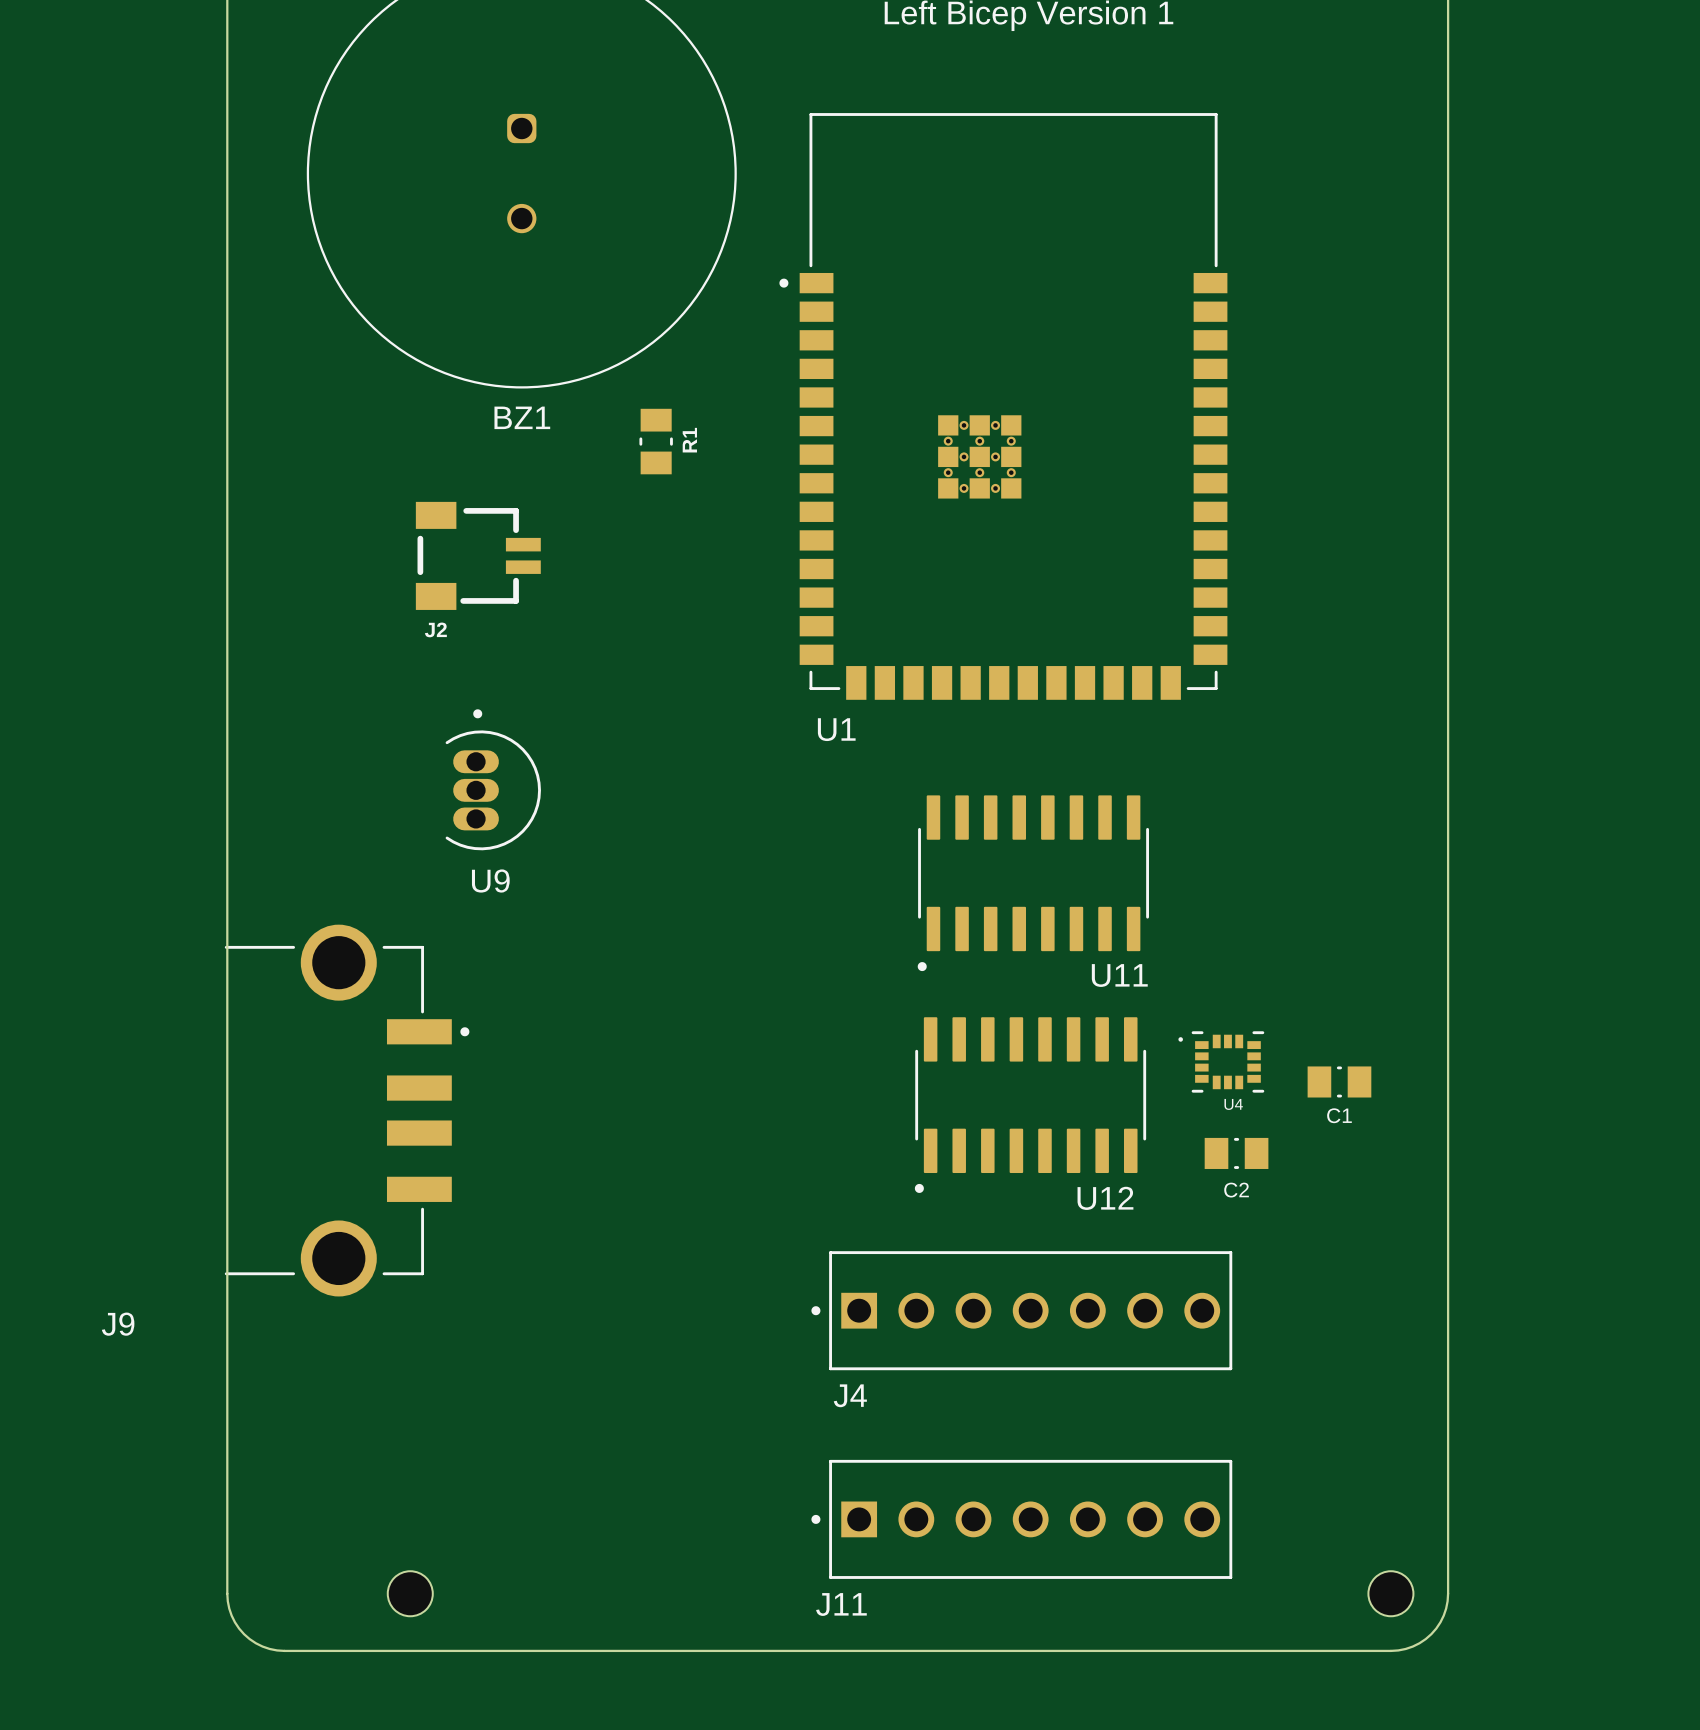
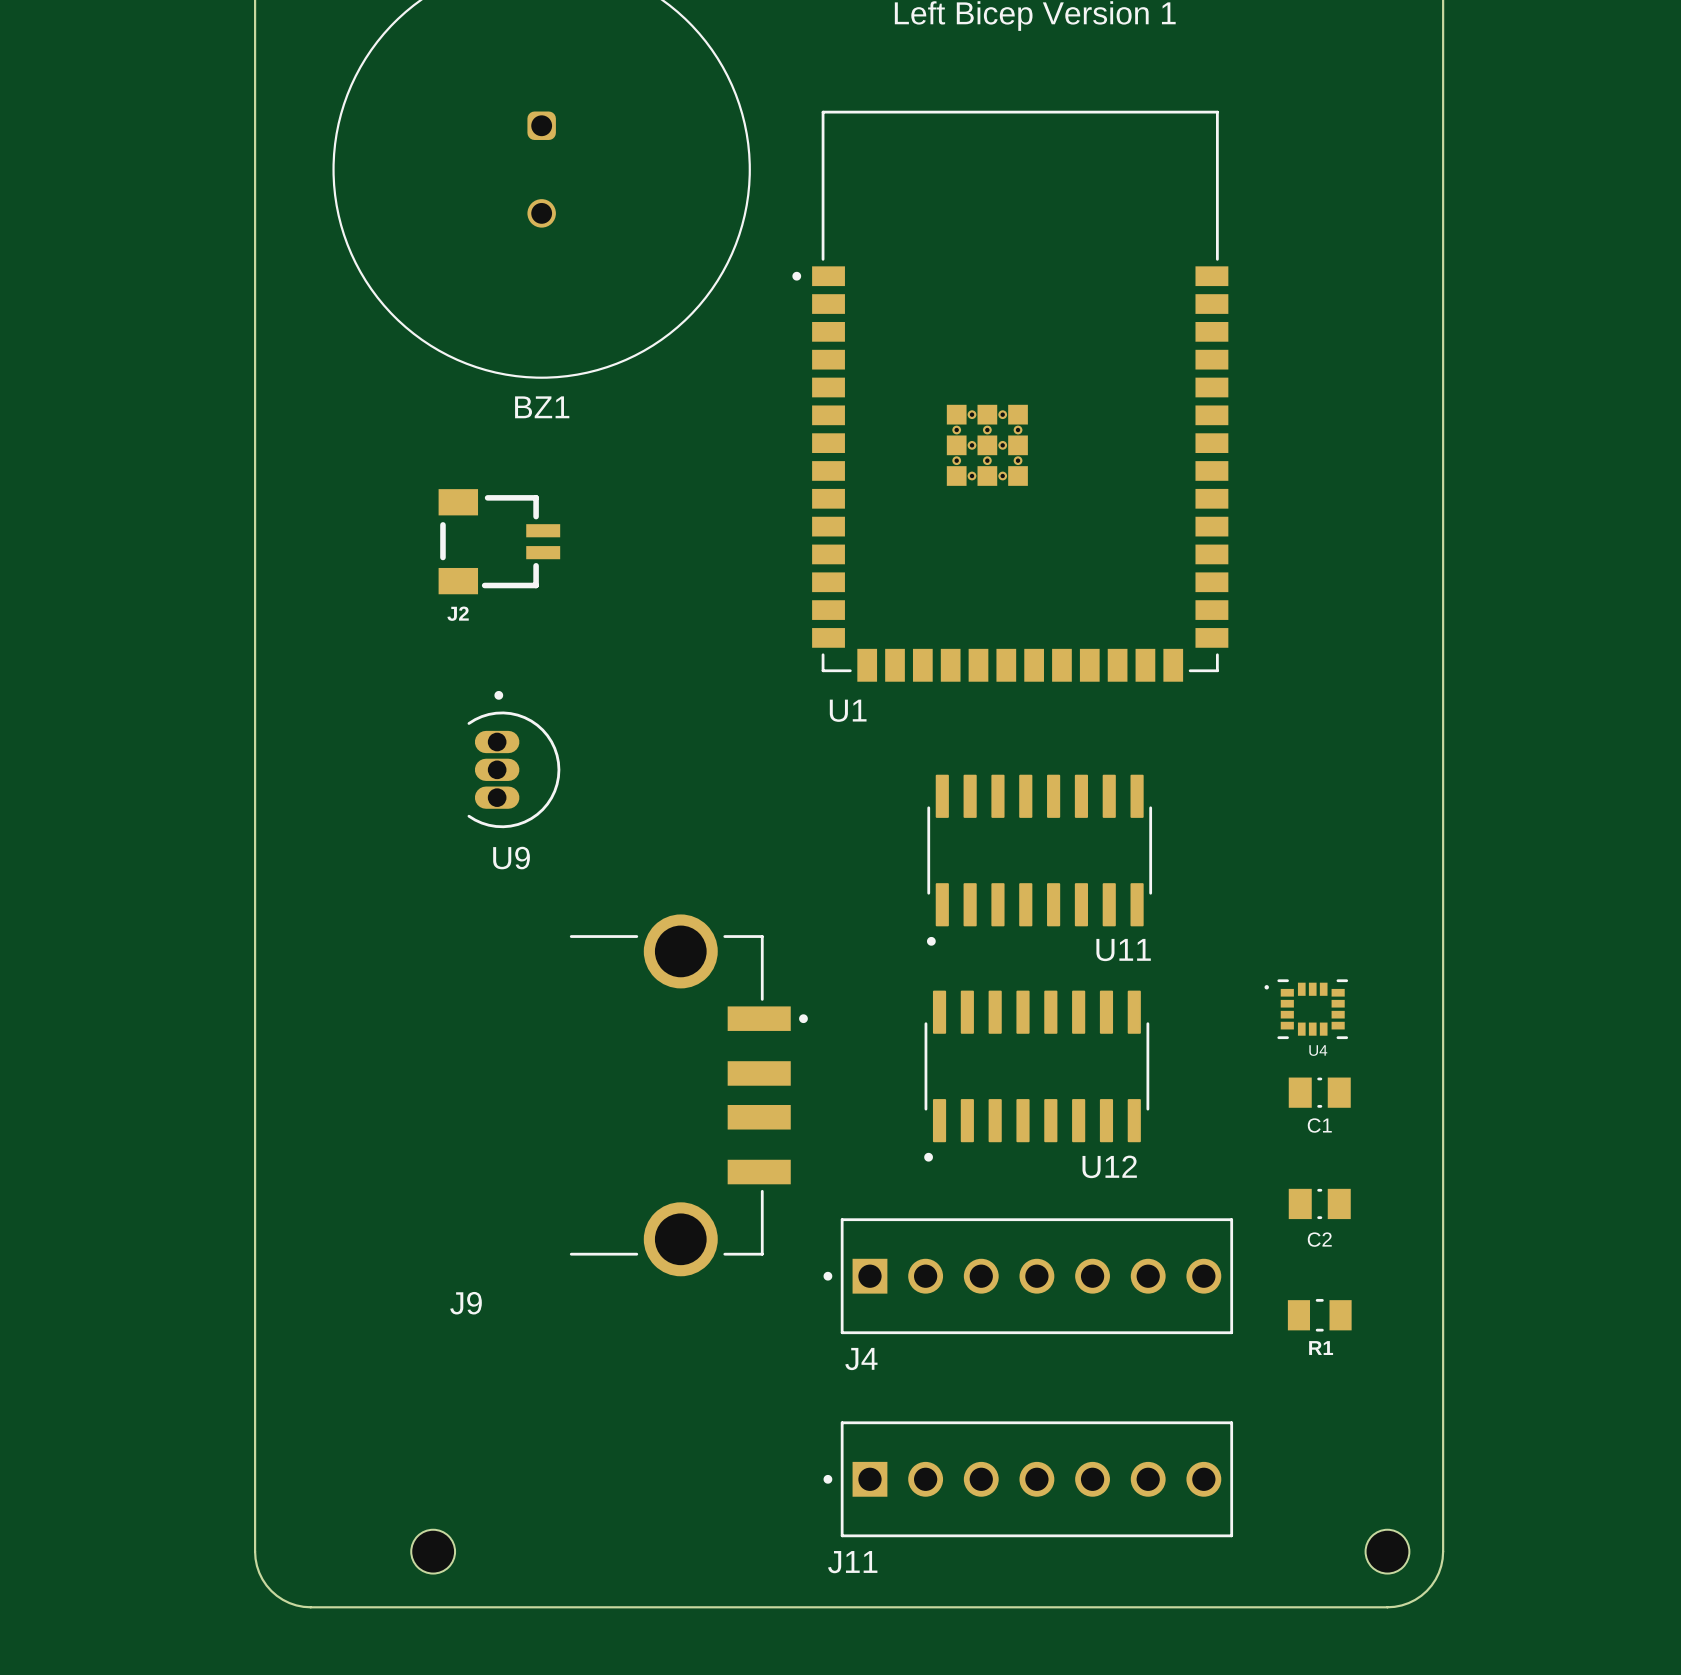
R1 rotation: 0° (656, 441) -> 90° clockwise (1319, 1315)
R1 position: (656, 441) -> (1319, 1315)
U4 position: (1221, 1061) -> (1306, 1009)
C1 position: (1339, 1081) -> (1319, 1092)
J9 position: (347, 1110) -> (688, 1095)
C2 position: (1236, 1153) -> (1319, 1203)

